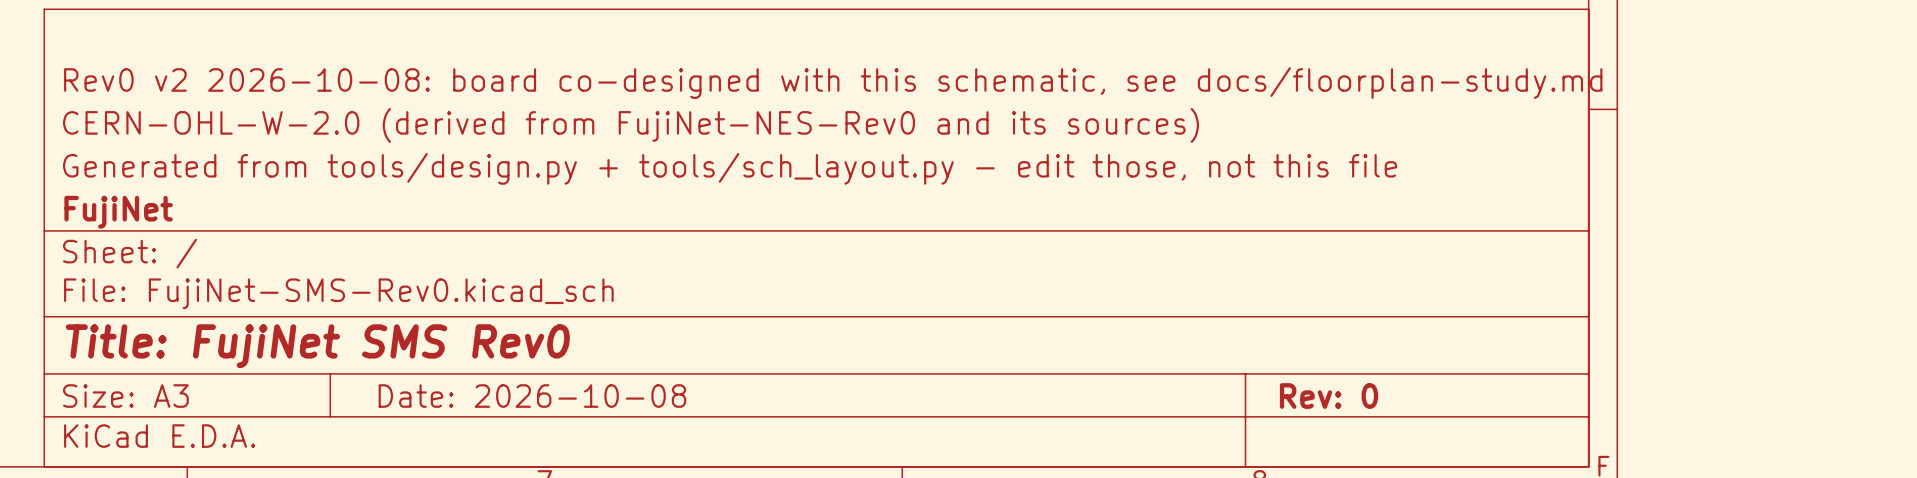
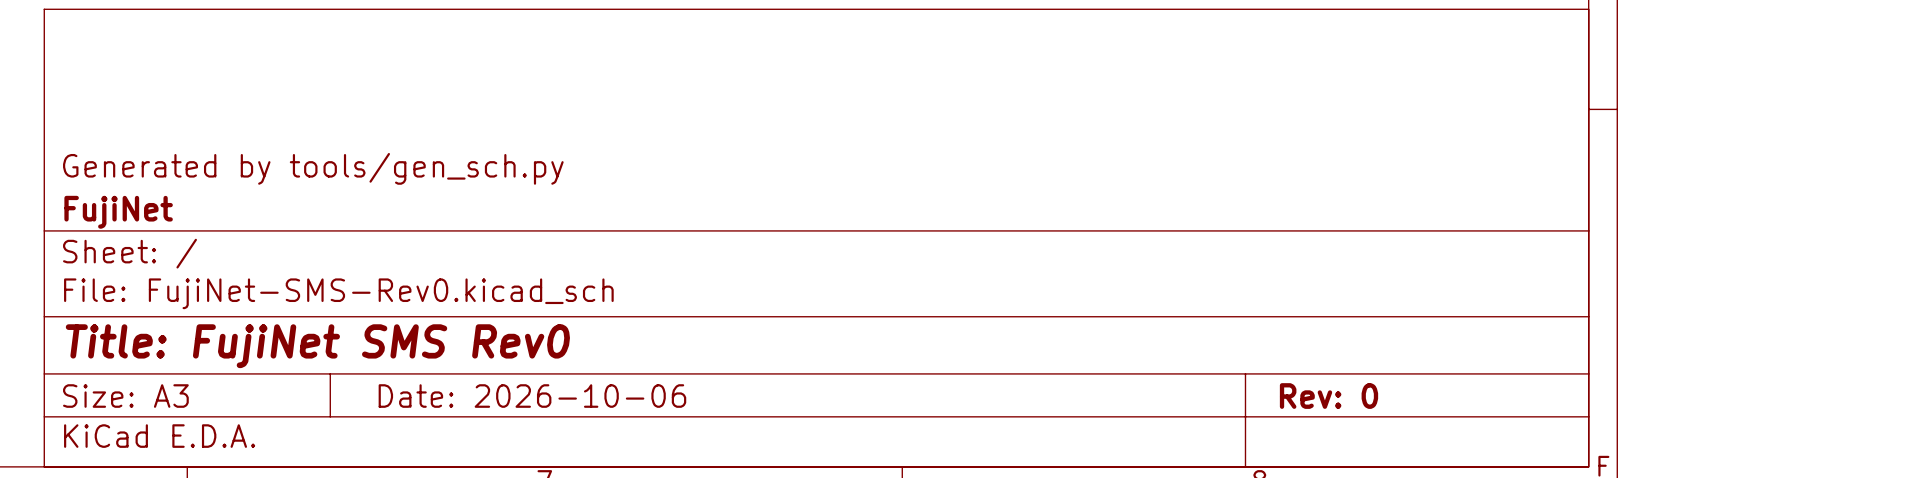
title block: Rev0 v2 2026-10-08: board co-designed with this schematic, see docs/floorplan-study.md (833, 83) -> none
title block: CERN-OHL-W-2.0 (derived from FujiNet-NES-Rev0 and its sources) (631, 125) -> none
title block: Generated from tools/design.py + tools/sch_layout.py - edit those, not this file (730, 168) -> Generated by tools/gen_sch.py (313, 168)
title block: Date: 2026-10-08 (532, 396) -> Date: 2026-10-06 (532, 396)

